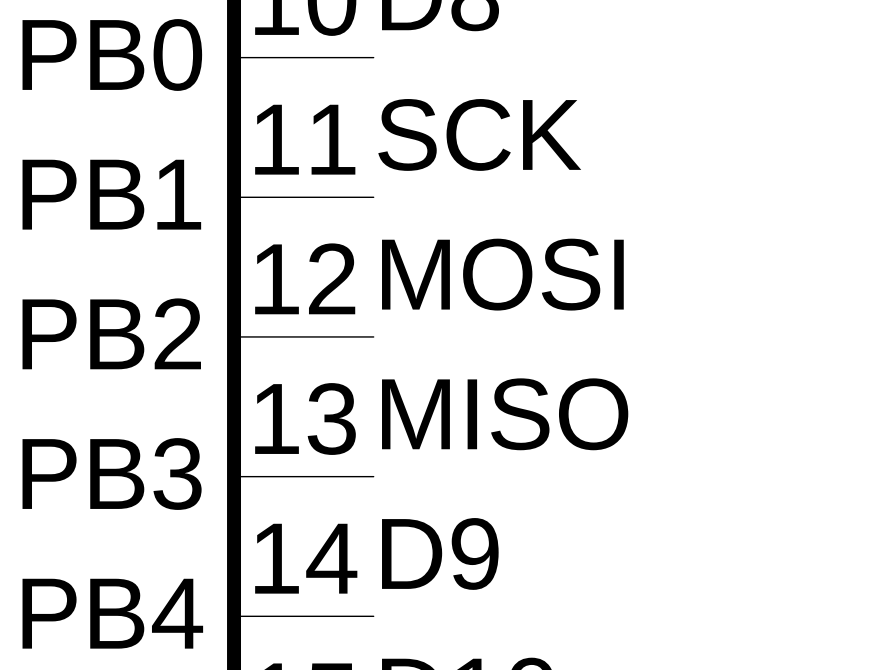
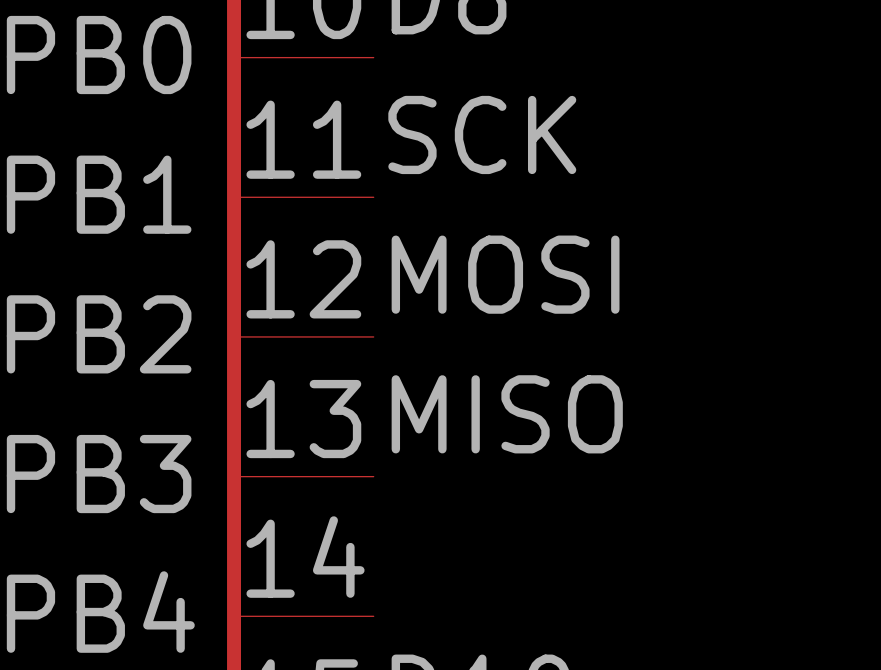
label: D9 (440, 553) -> none

